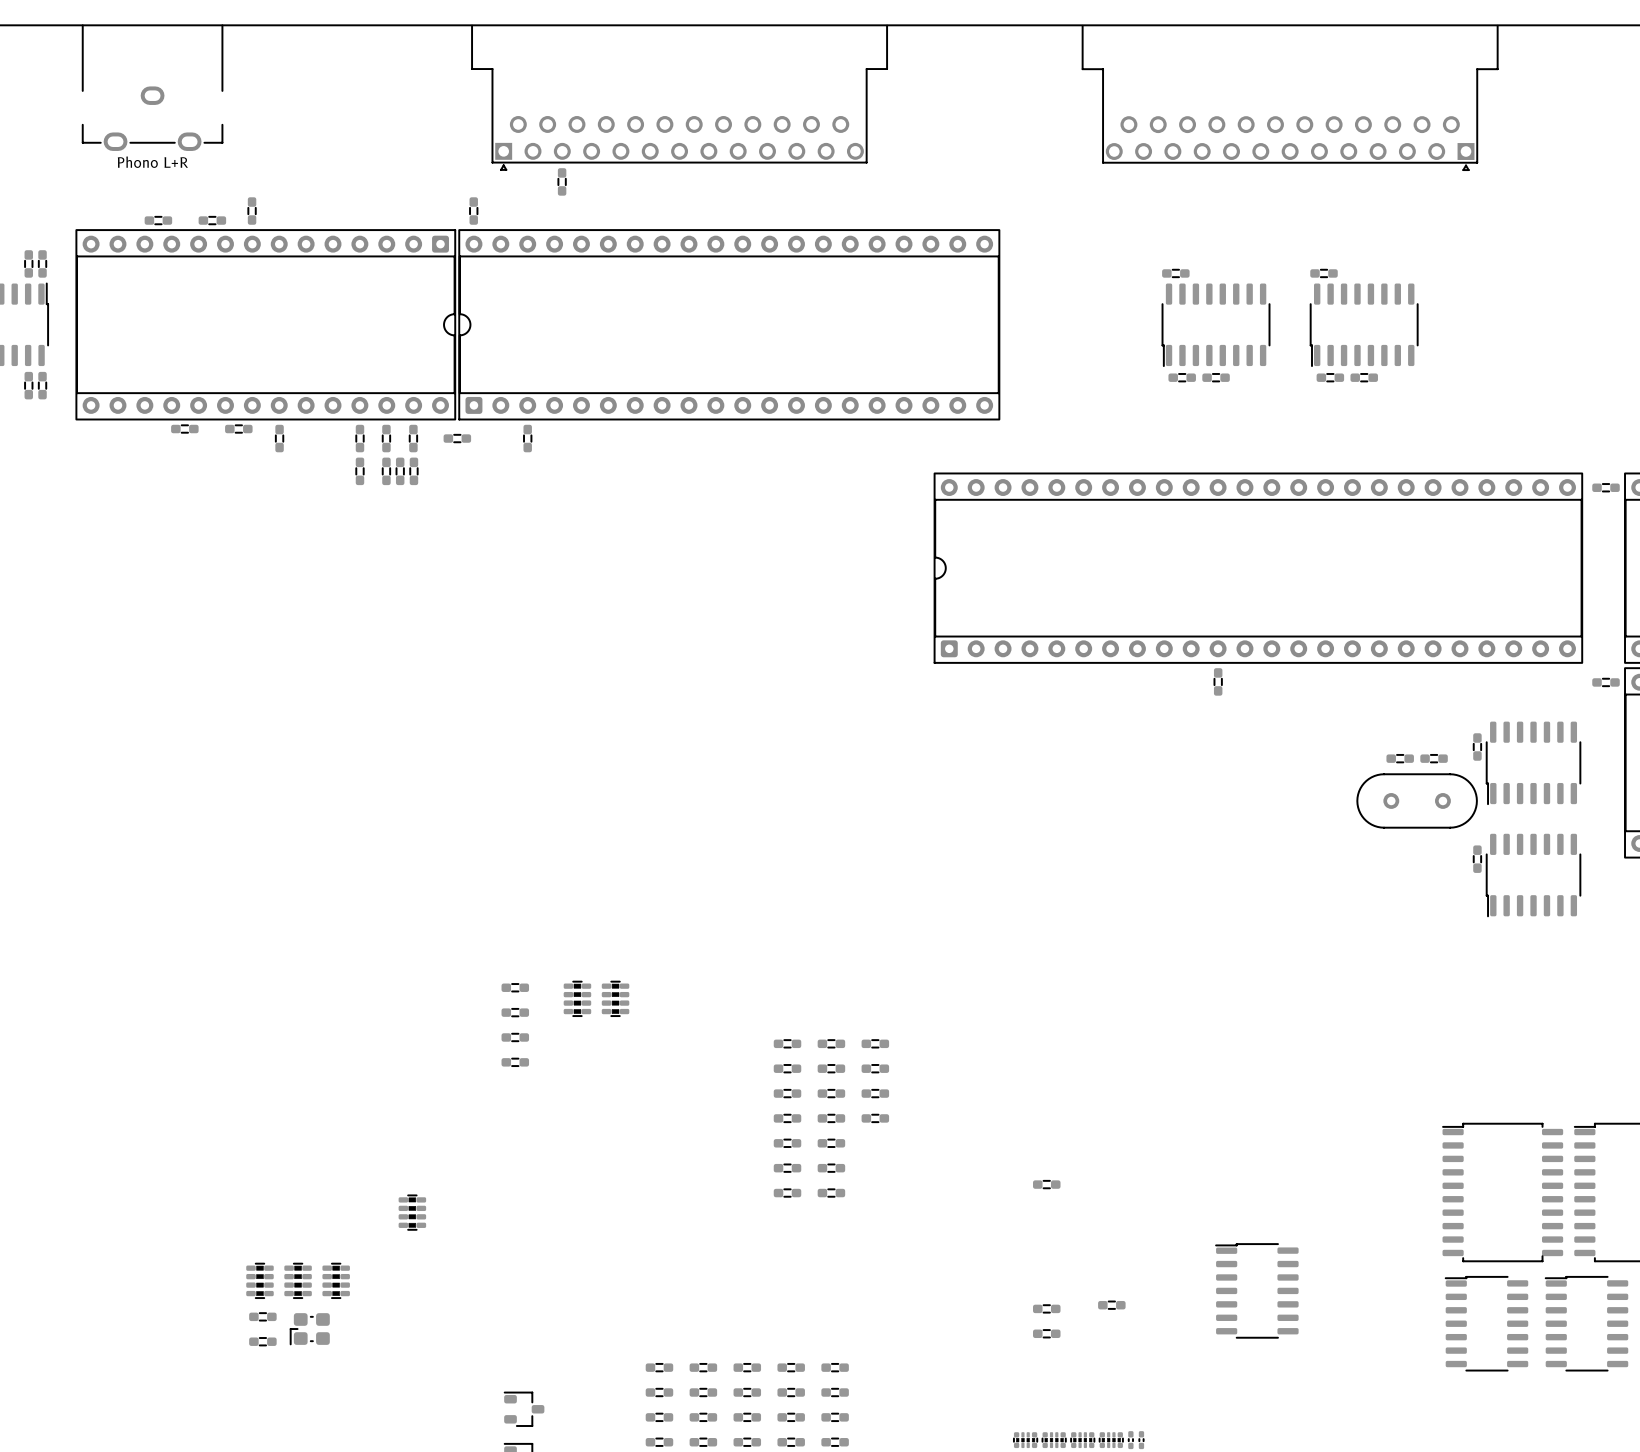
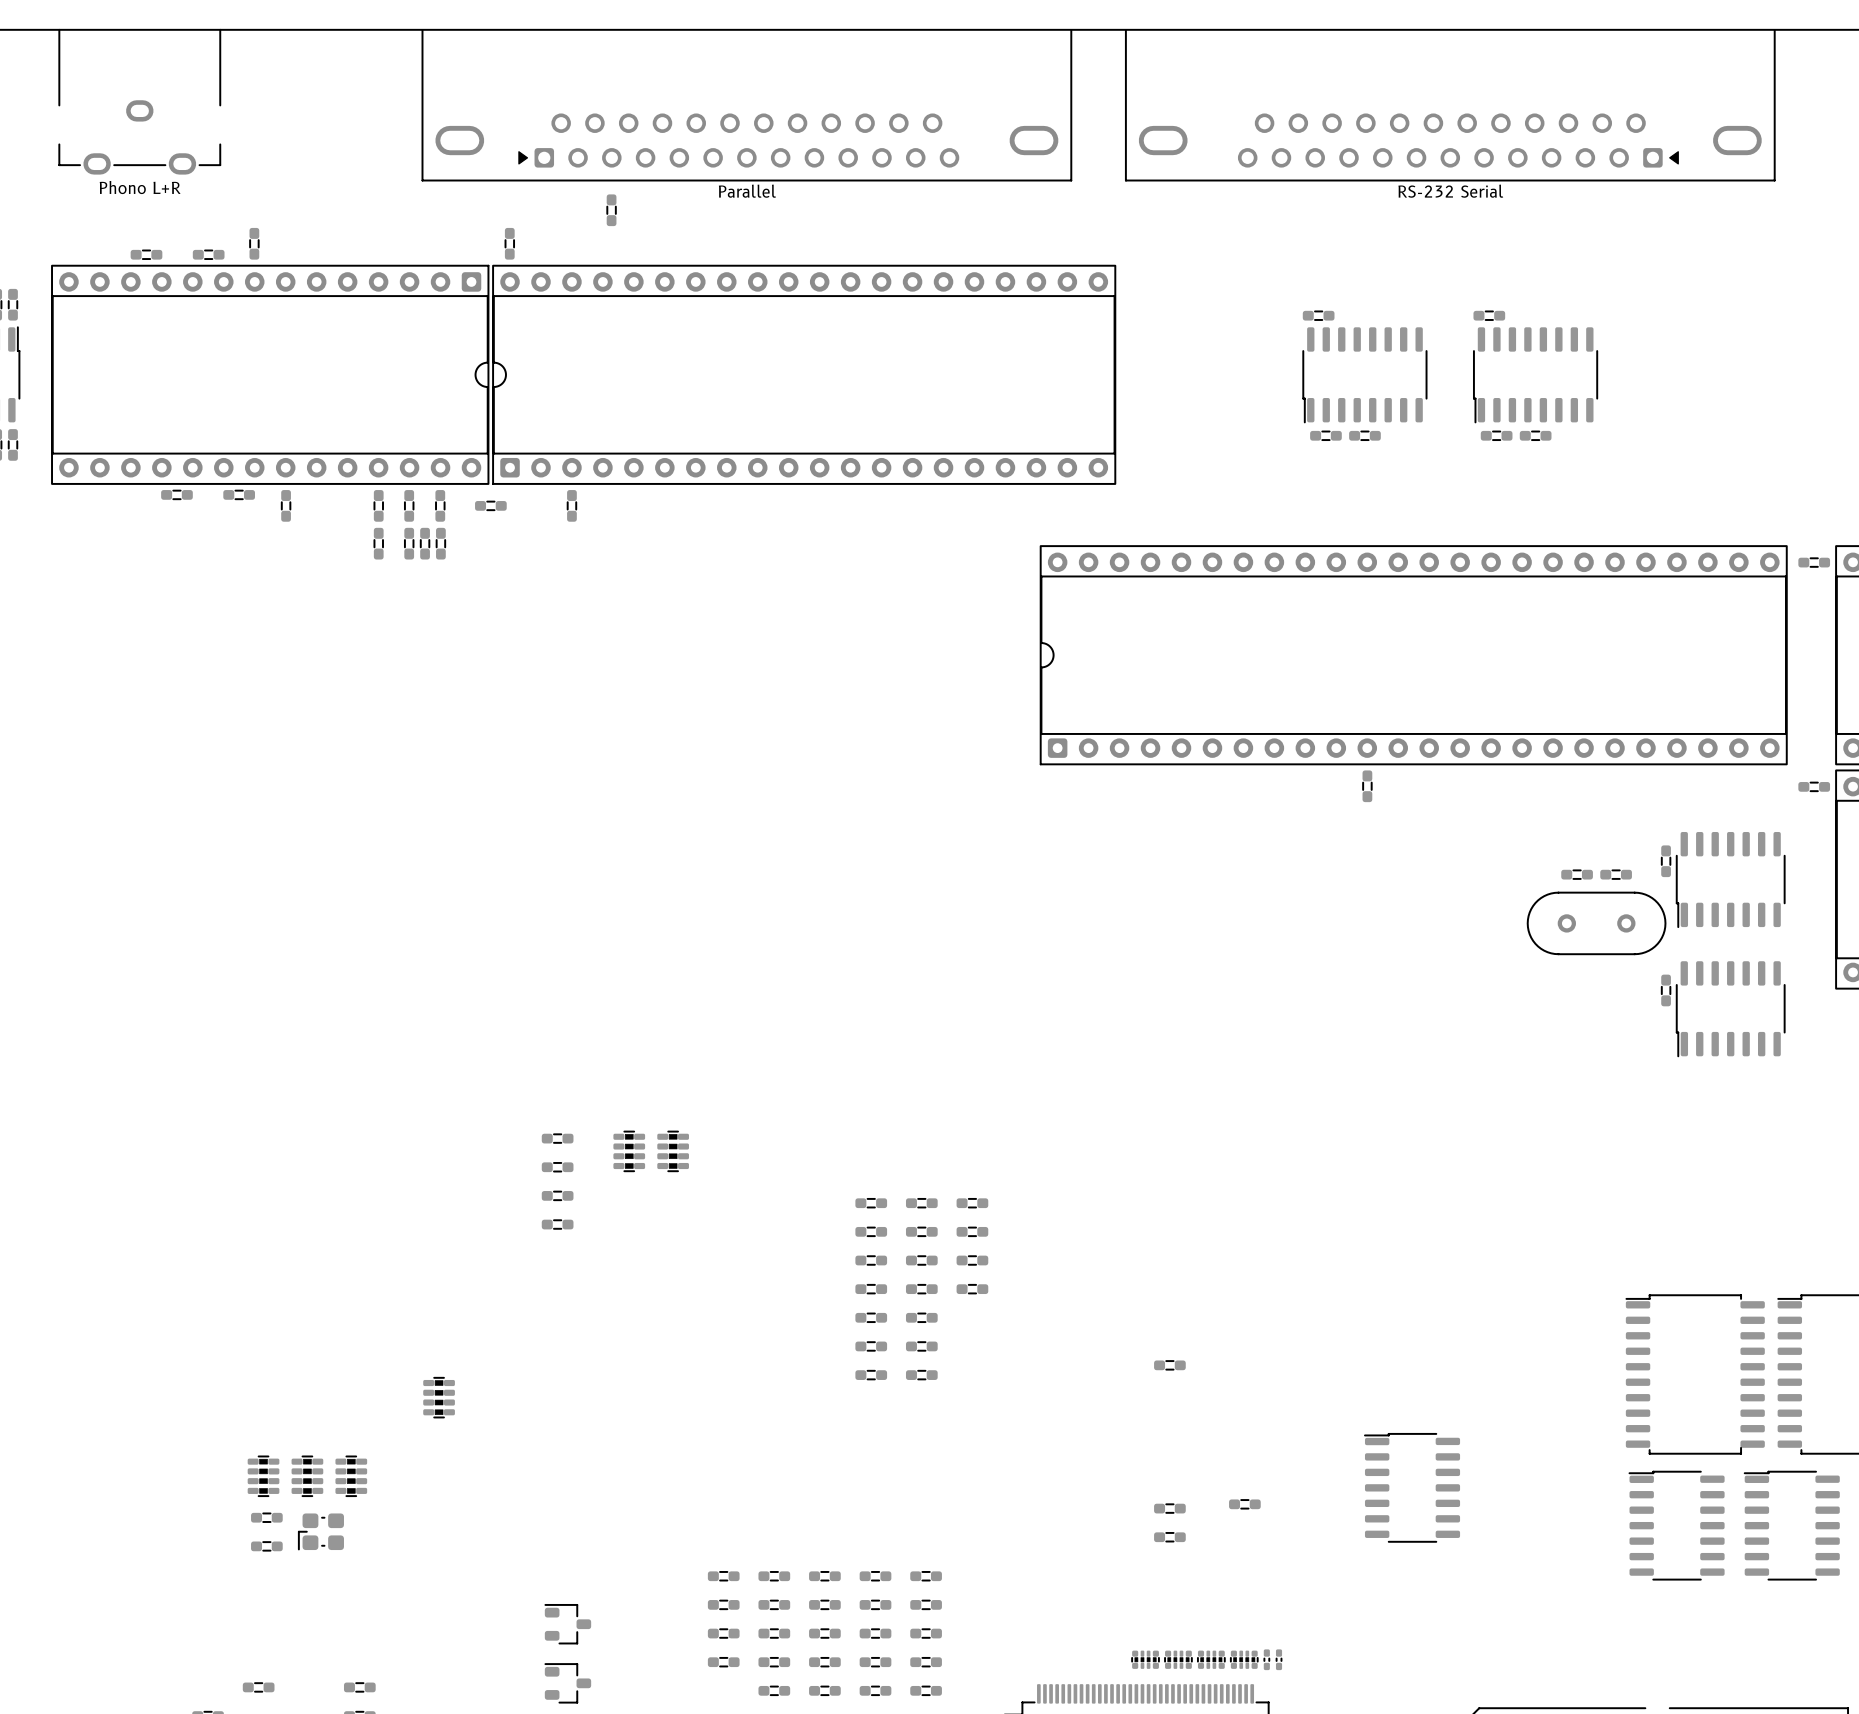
part footprint: [471, 25, 888, 171] -> [421, 29, 1073, 182]
part footprint: [1081, 25, 1499, 171] -> [1125, 29, 1776, 182]
part value: none -> Parallel (747, 191)
part value: none -> RS-232 Serial (1450, 191)

